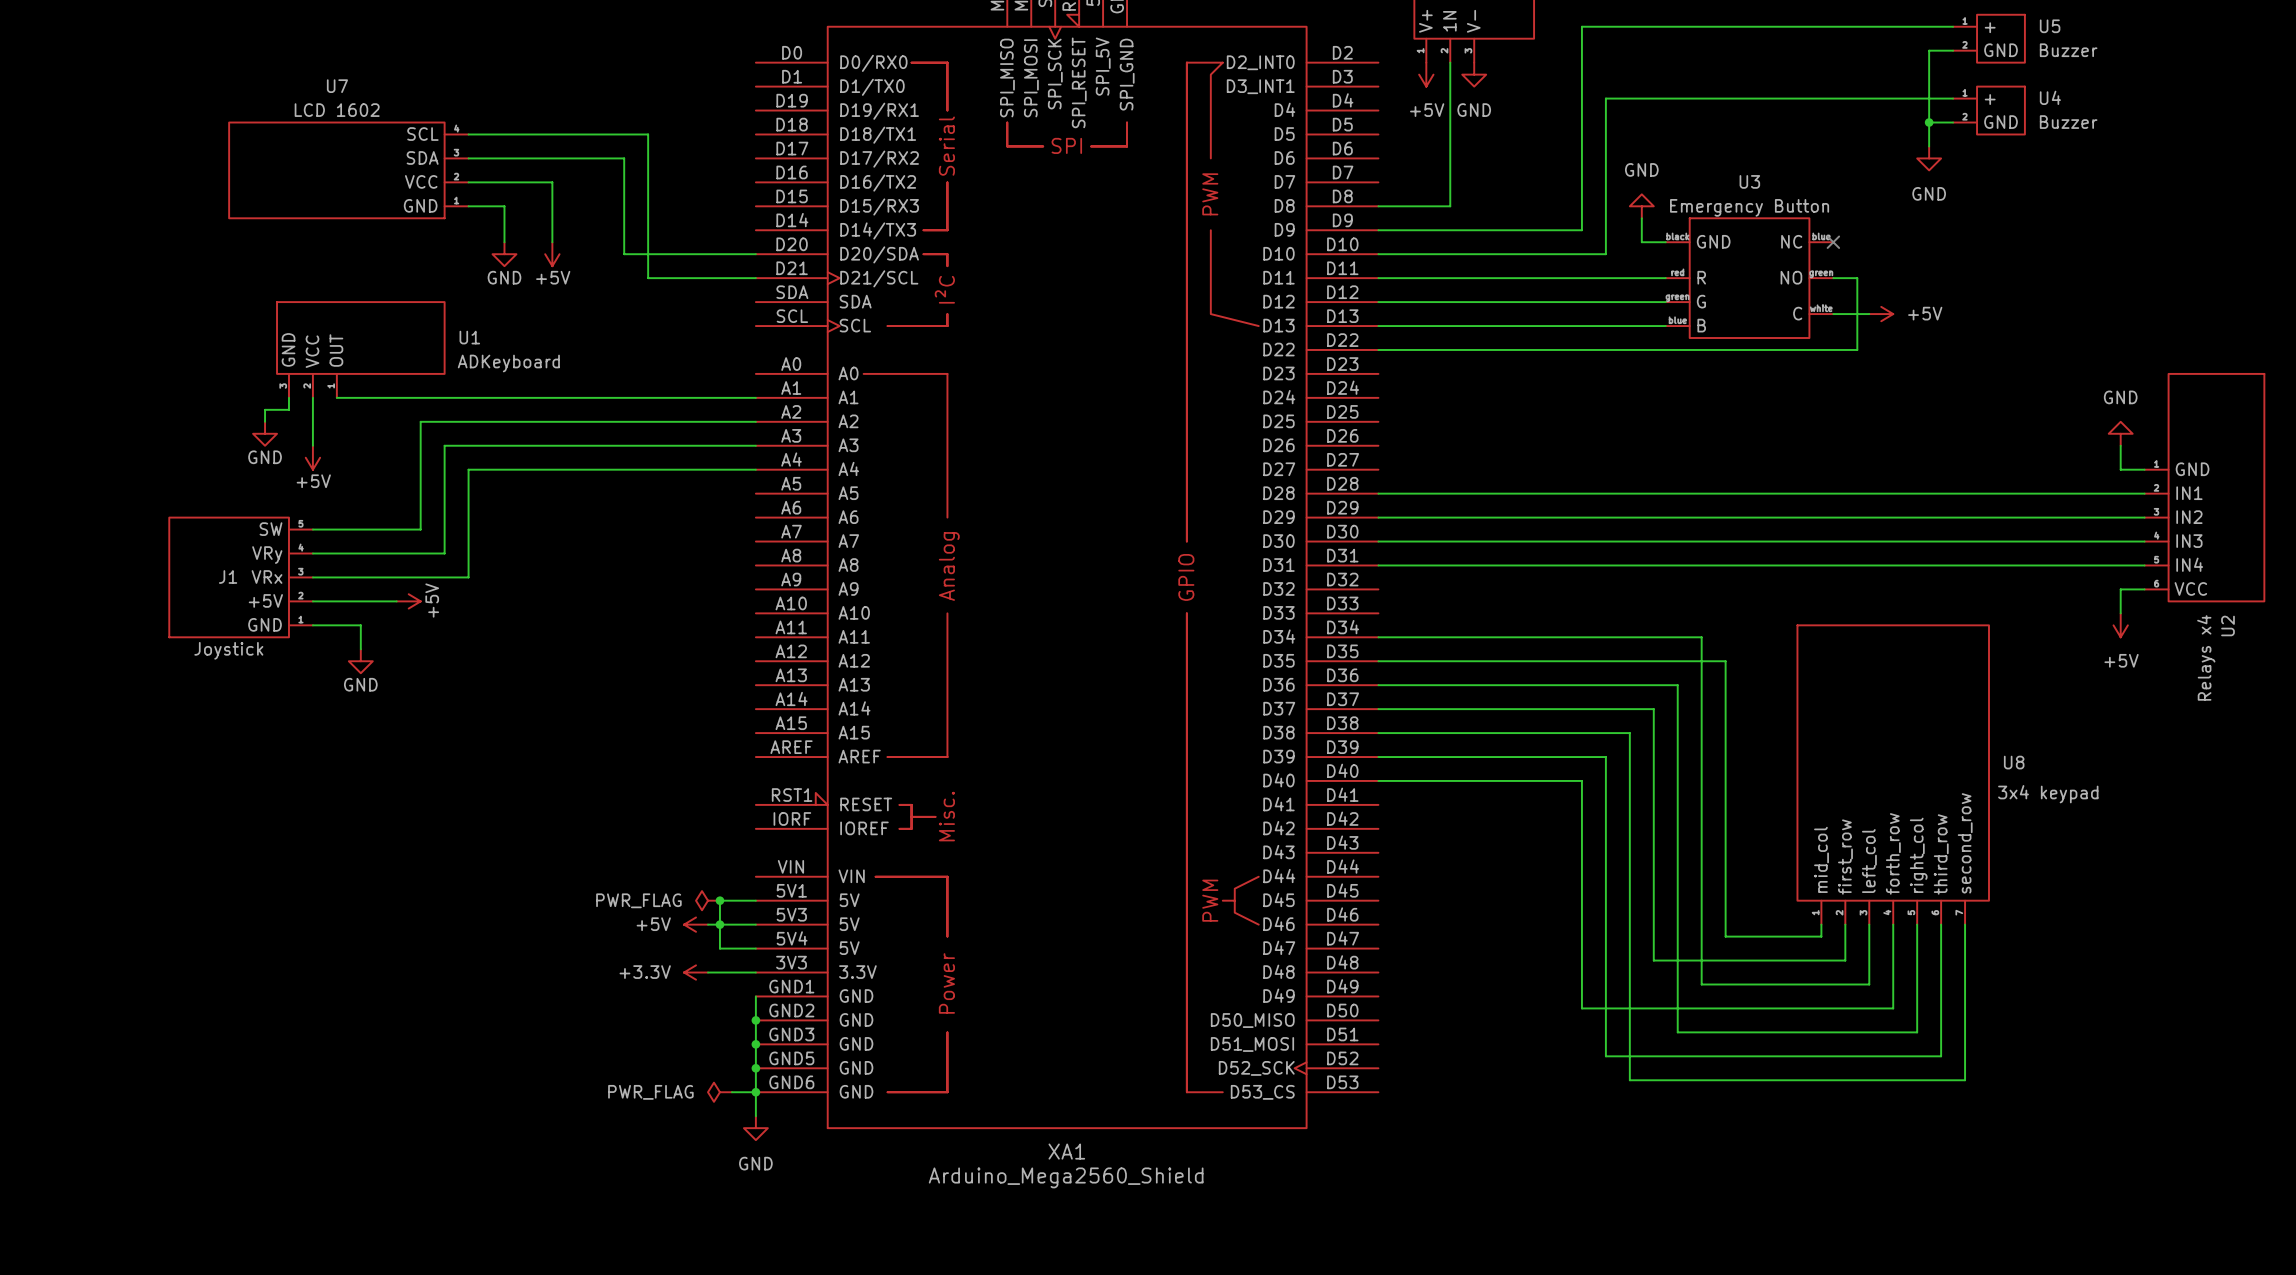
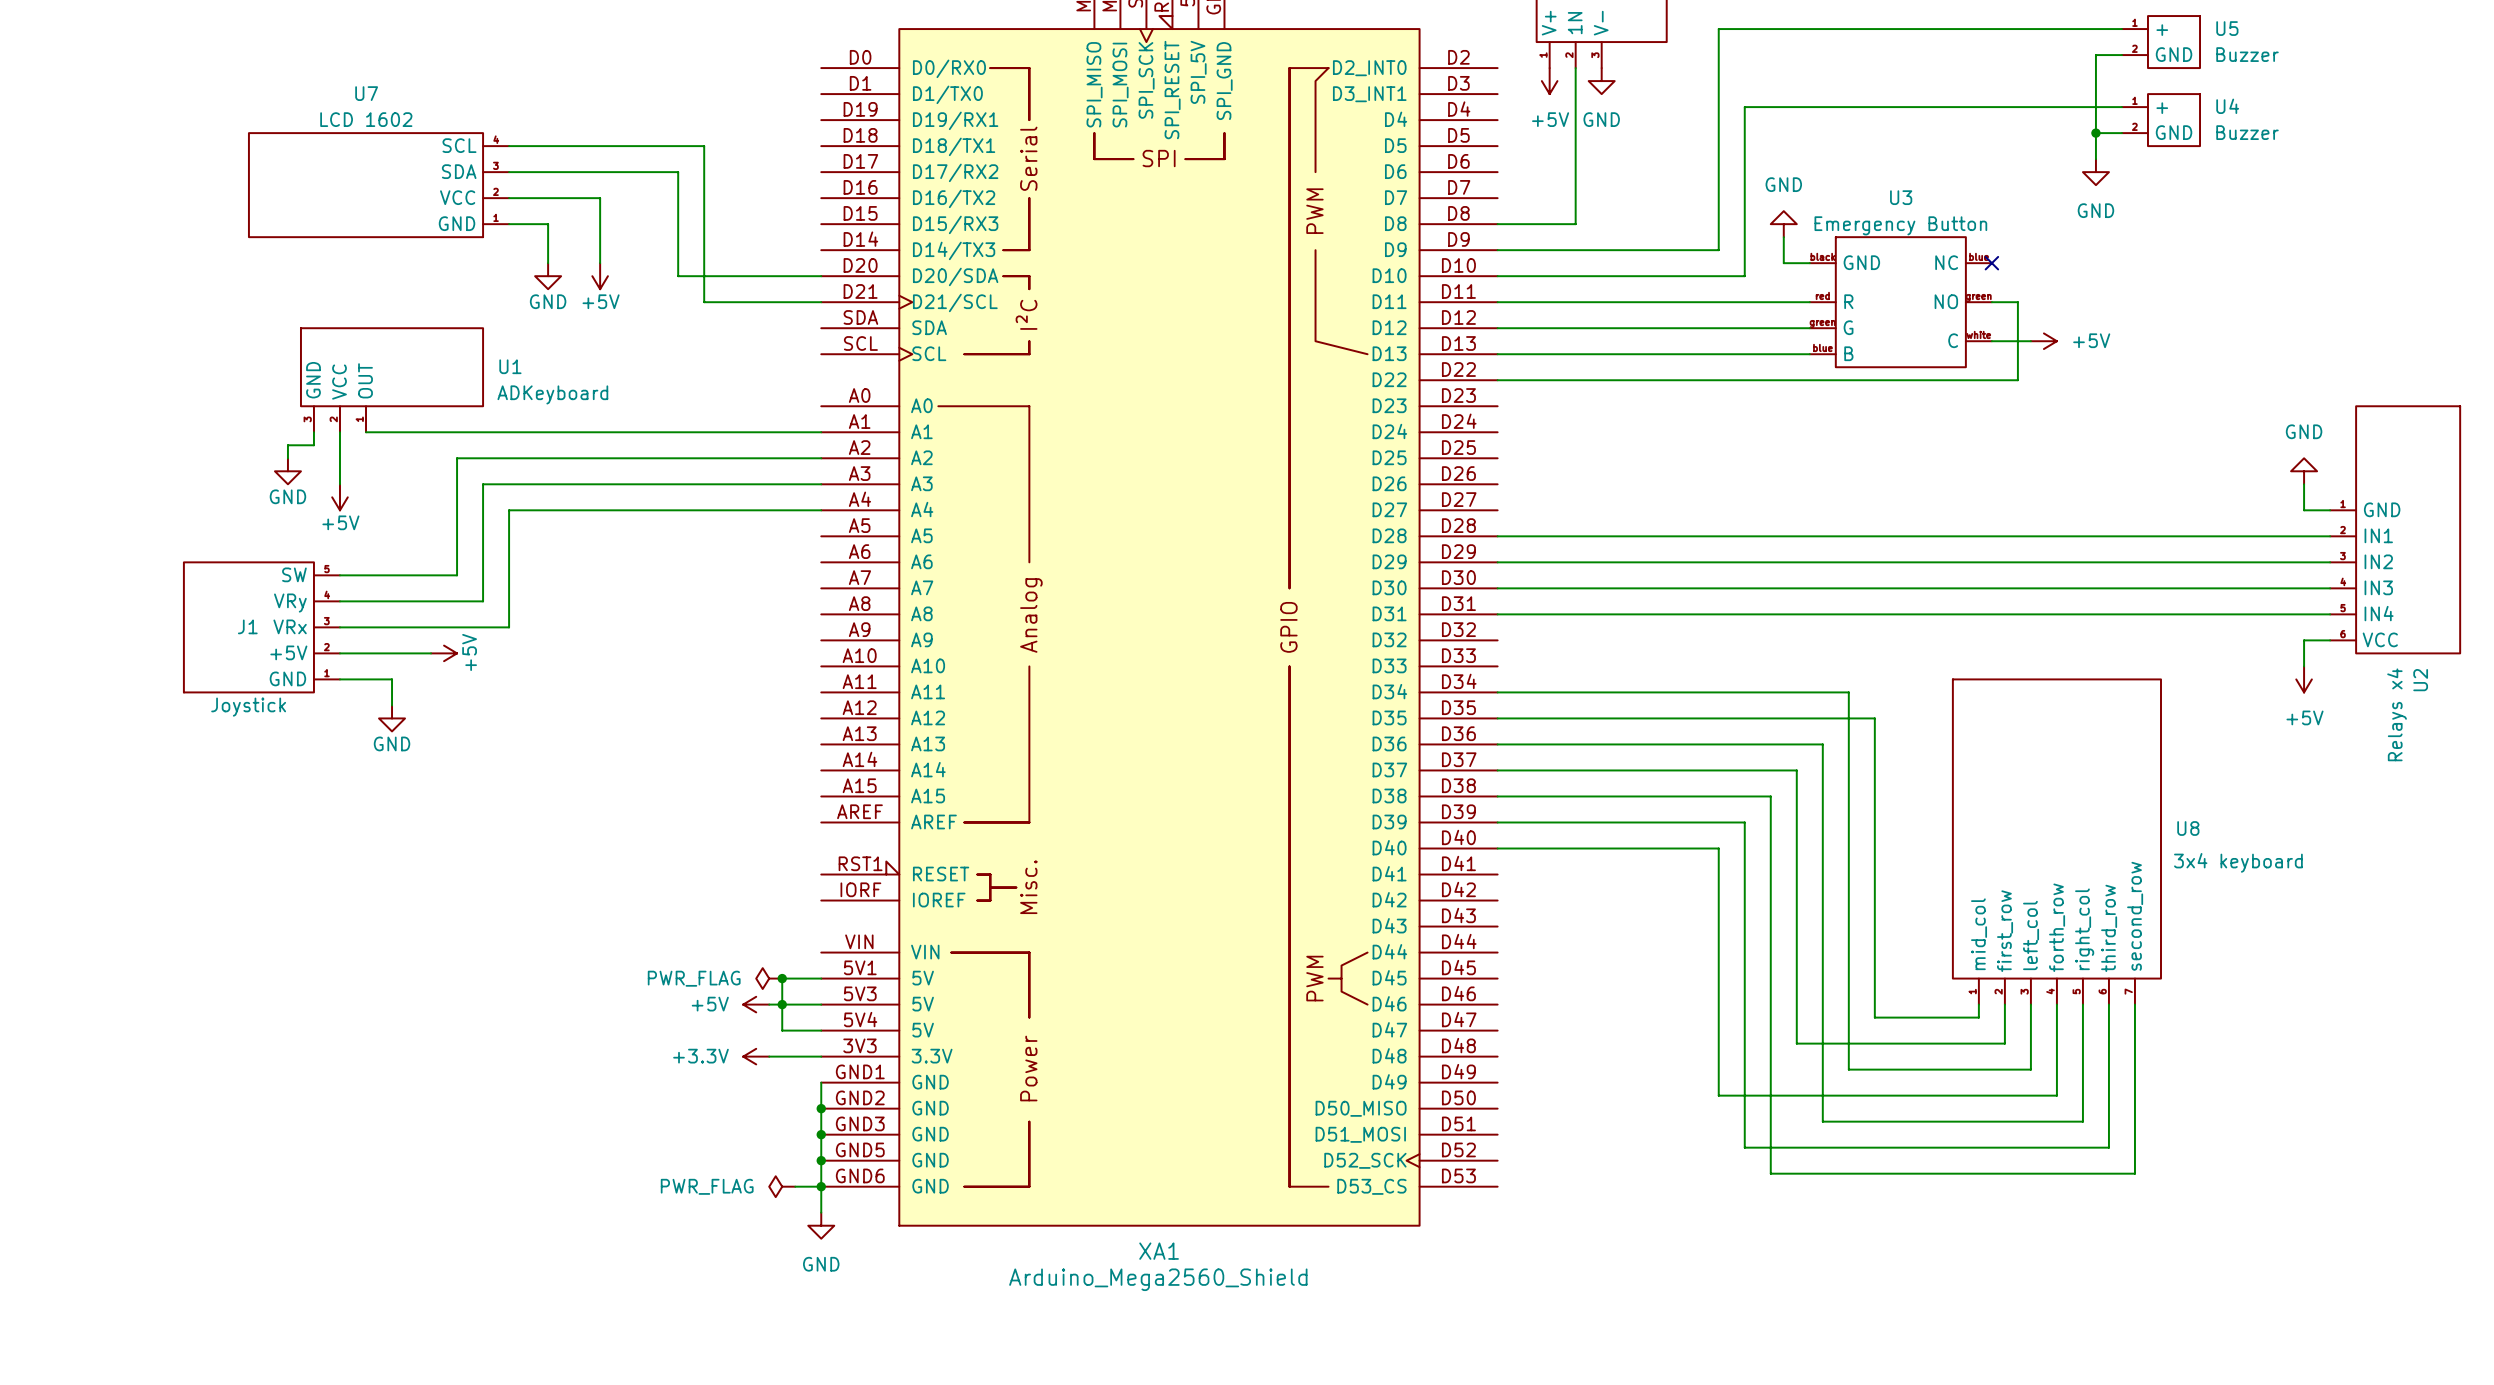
U8 value: 3x4 keypad (2048, 794) -> 3x4 keyboard (2238, 862)

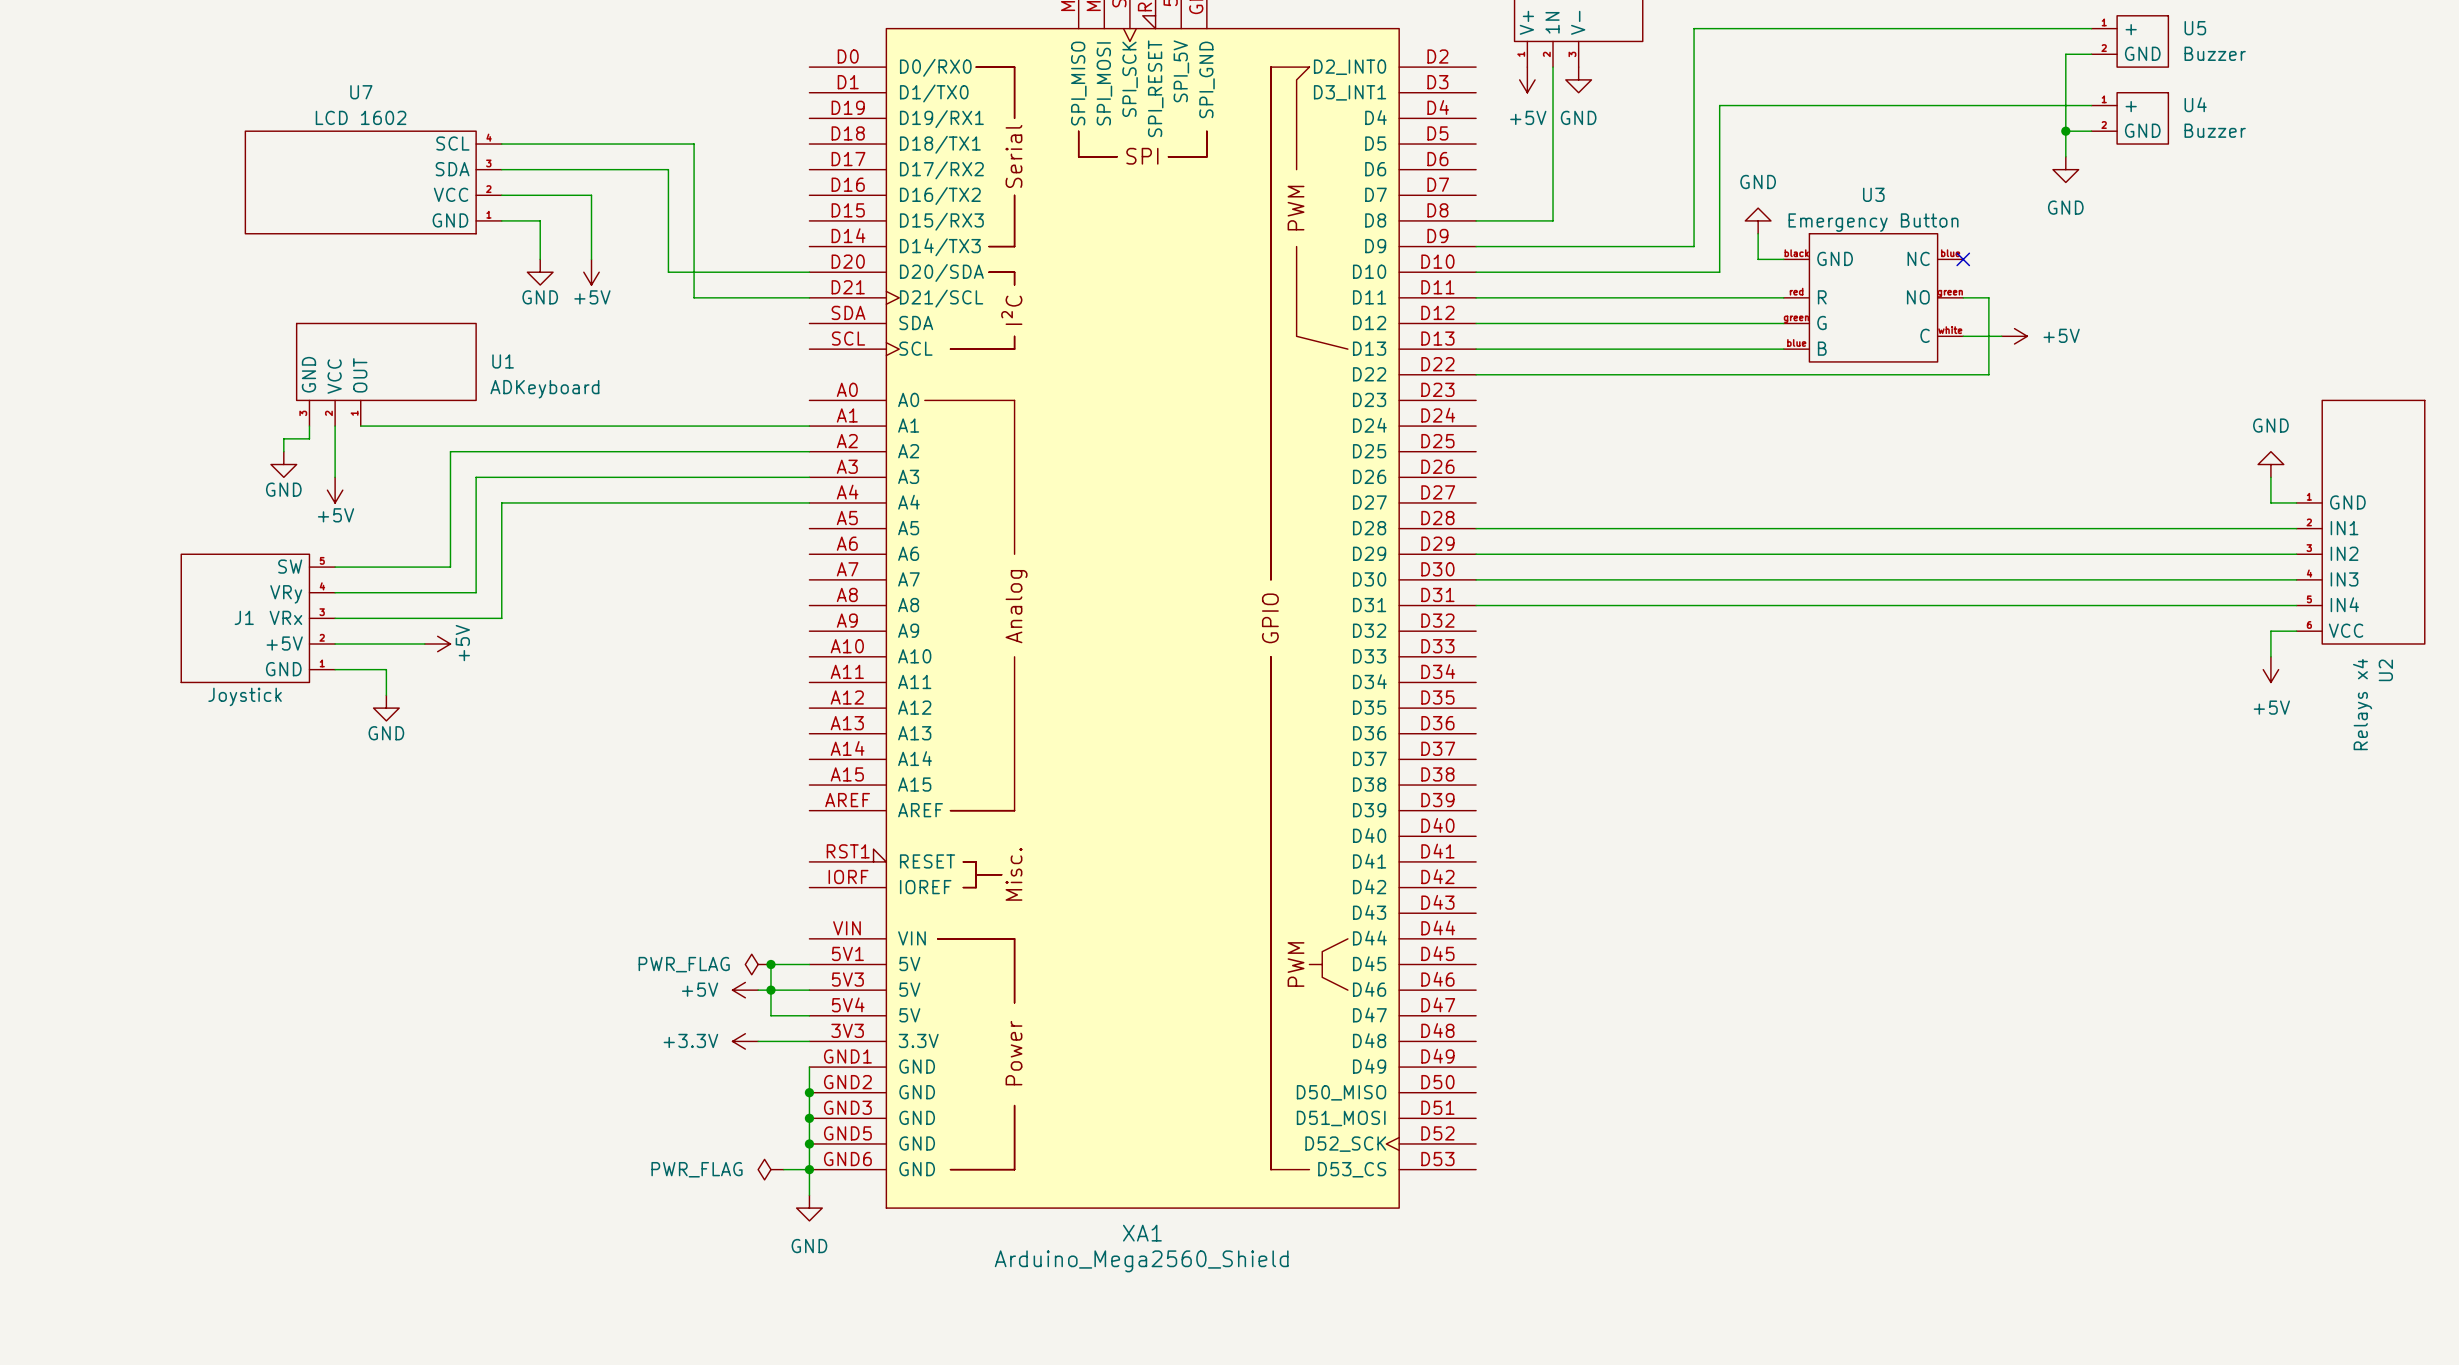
wire: (1497, 692) (1848, 692) (1848, 1069) (2030, 1069) (2030, 1004) -> none
wire: (1497, 718) (1874, 718) (1874, 1017) (1978, 1017) (1978, 1004) -> none
wire: (1497, 744) (1822, 744) (1822, 1121) (2082, 1121) (2082, 1004) -> none
wire: (1497, 770) (1796, 770) (1796, 1043) (2004, 1043) (2004, 1004) -> none
wire: (1497, 796) (1770, 796) (1770, 1173) (2134, 1173) (2134, 1004) -> none
wire: (1497, 822) (1744, 822) (1744, 1147) (2108, 1147) (2108, 1004) -> none
U8: 3x4 keyboard (2056, 841) -> none
wire: (1497, 848) (1718, 848) (1718, 1095) (2056, 1095) (2056, 1004) -> none

